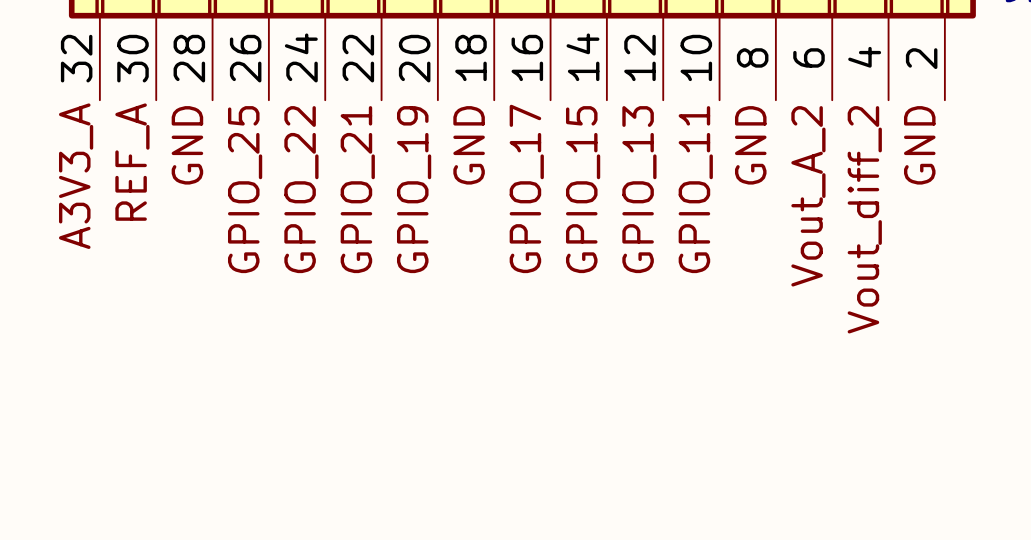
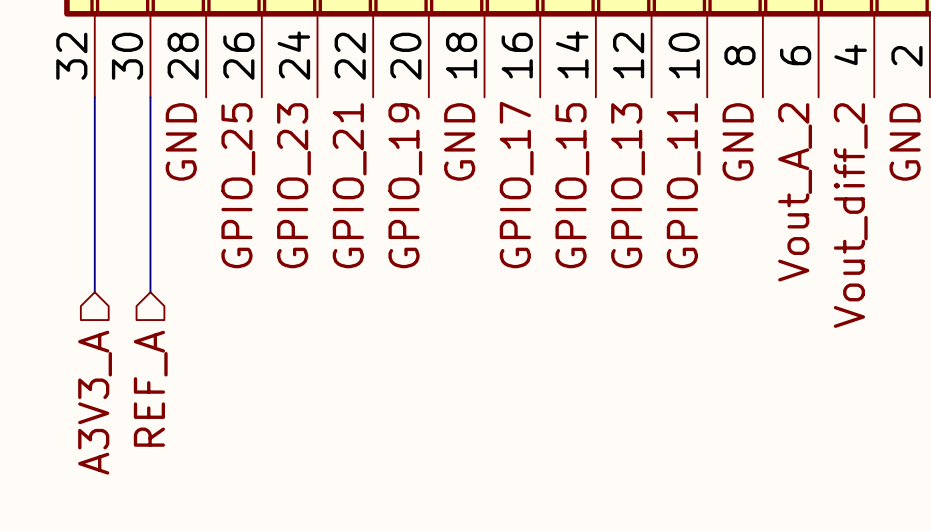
wire: none -> (94, 97) (94, 292)
wire: none -> (150, 97) (150, 292)
label: REF_A (132, 162) -> none
label: A3V3_A (76, 176) -> none
label: GPIO_22 (301, 189) -> GPIO_23 (293, 185)
hierarchical label: none -> REF_A (150, 388)
hierarchical label: none -> A3V3_A (95, 402)

